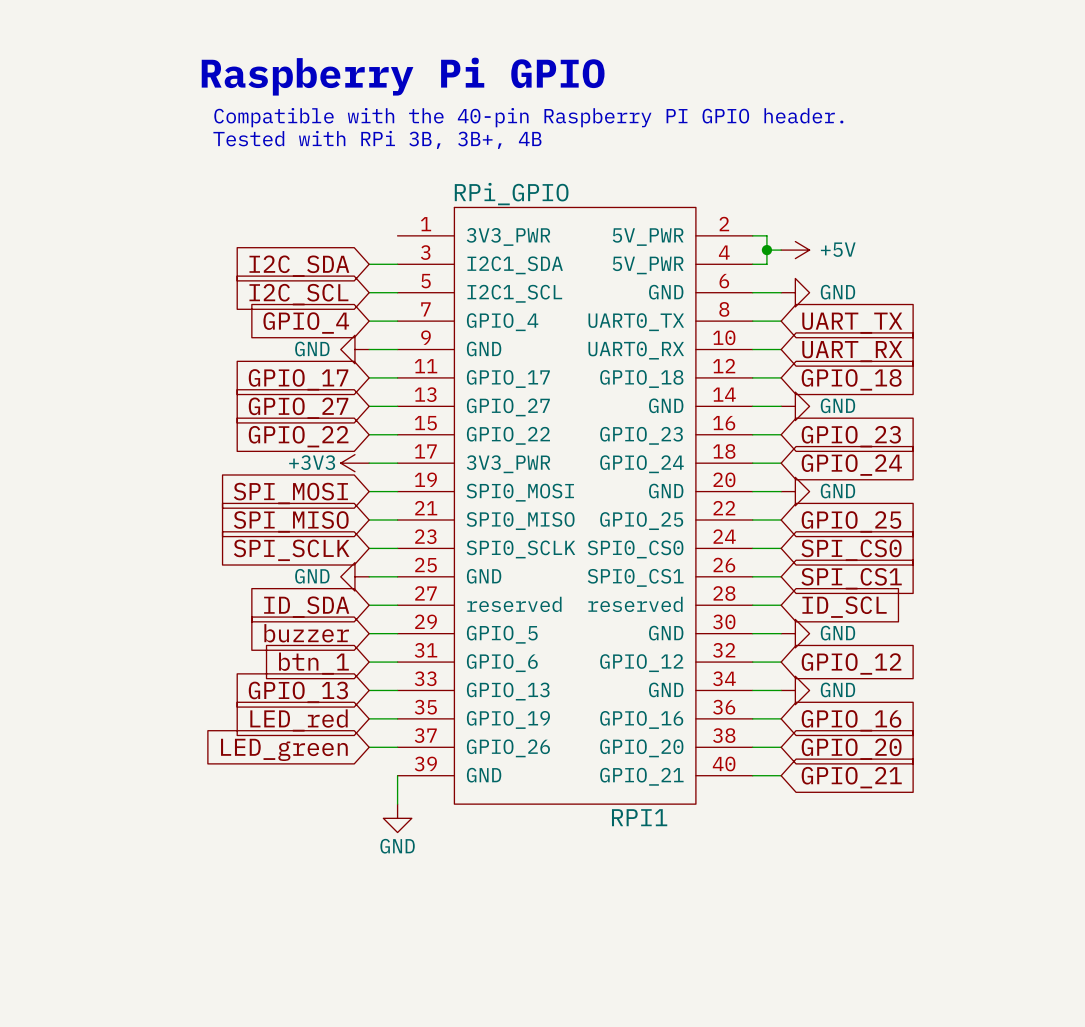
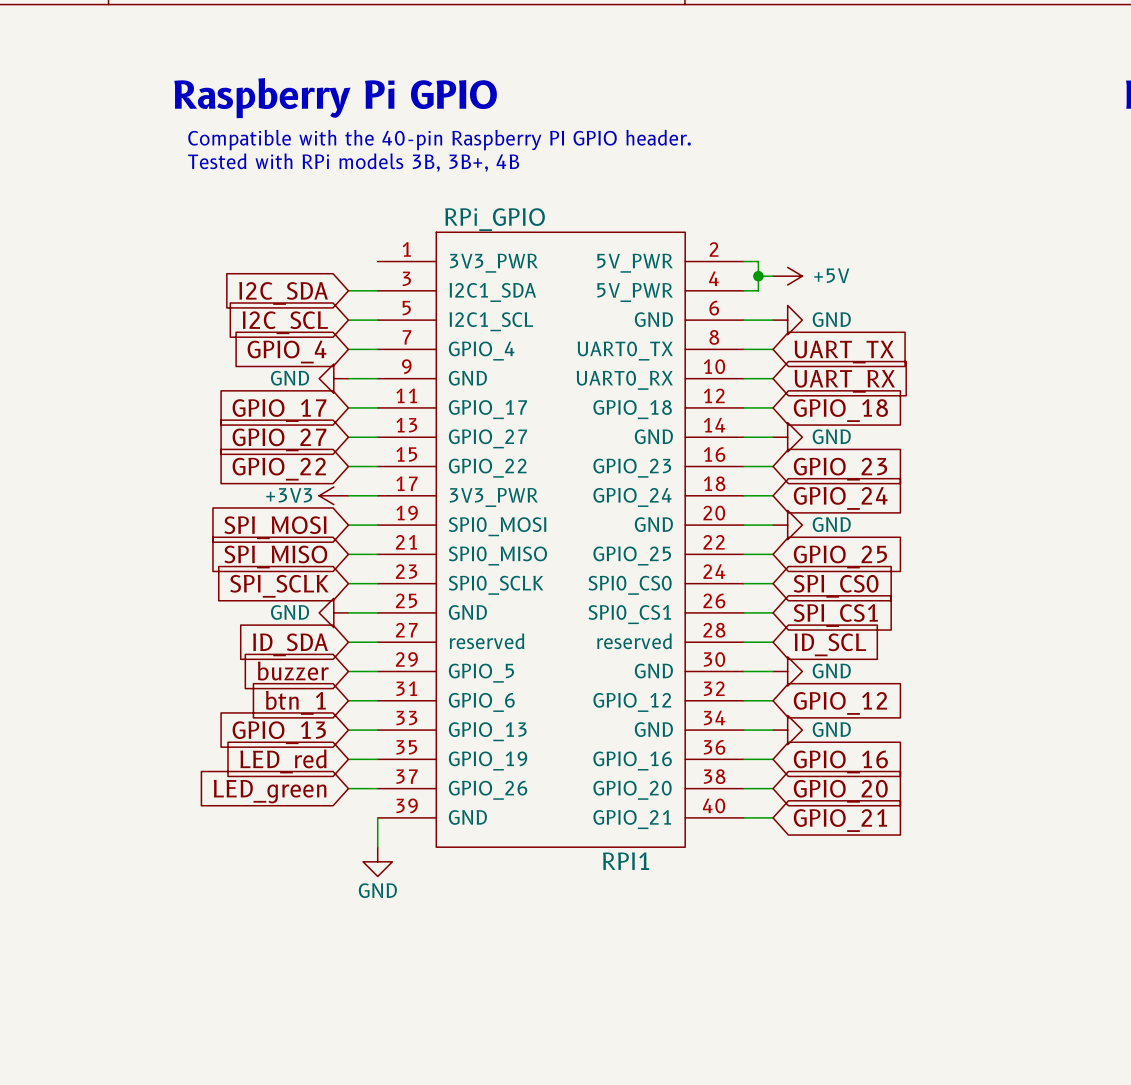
text: Tested with RPi 3B, 3B+, 4B (377, 139) -> Tested with RPi models 3B, 3B+, 4B (353, 162)

